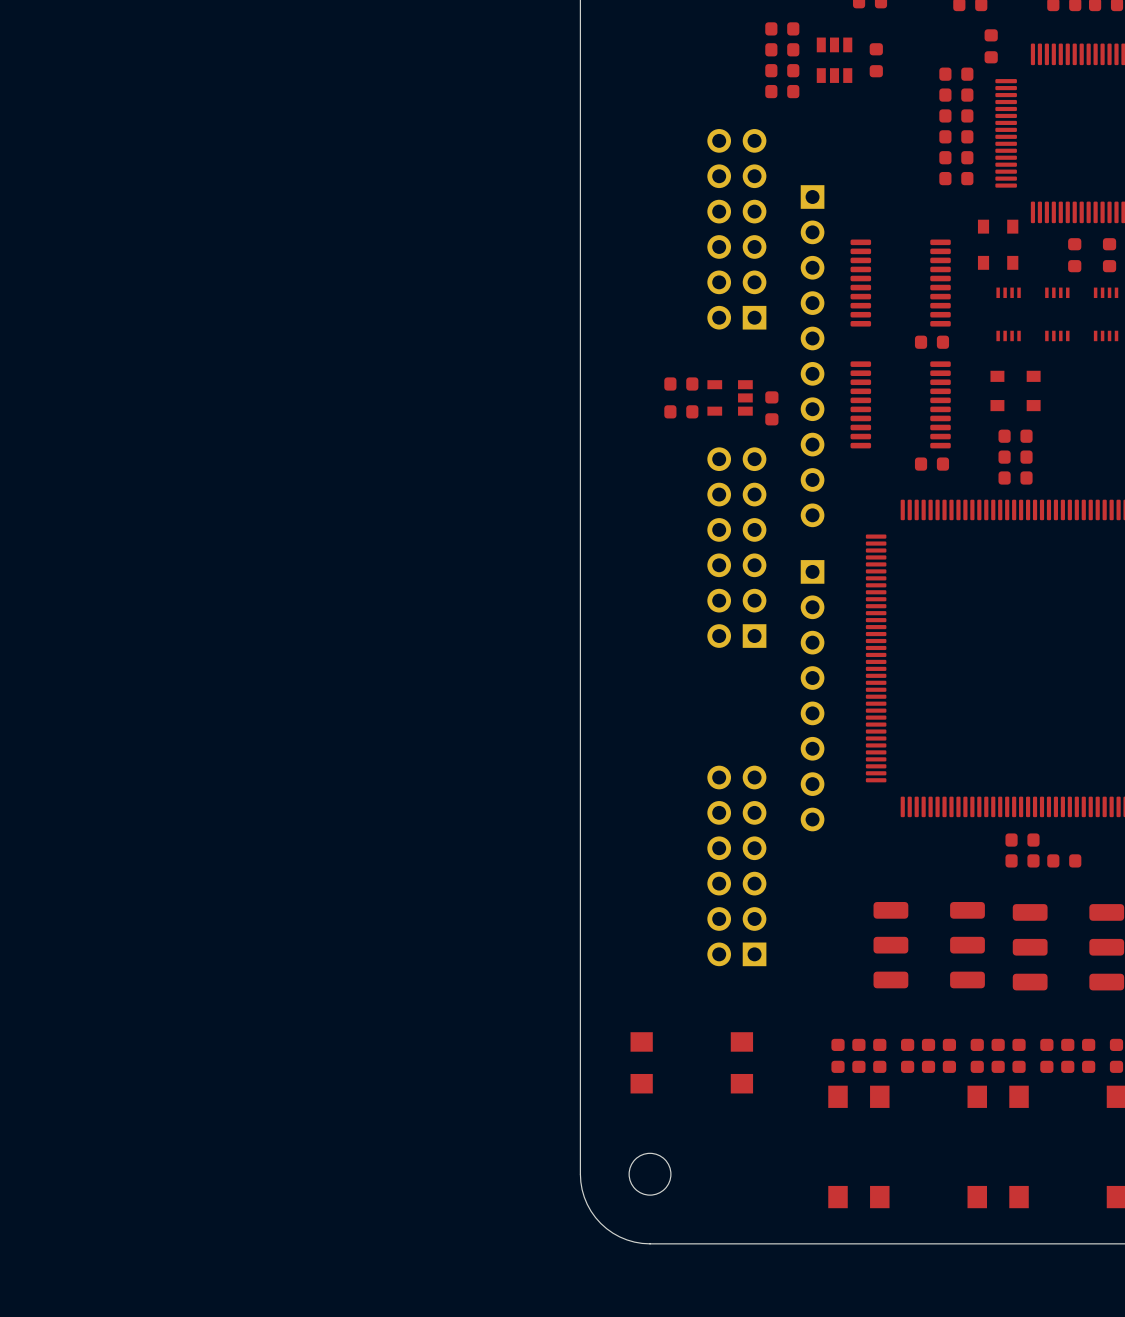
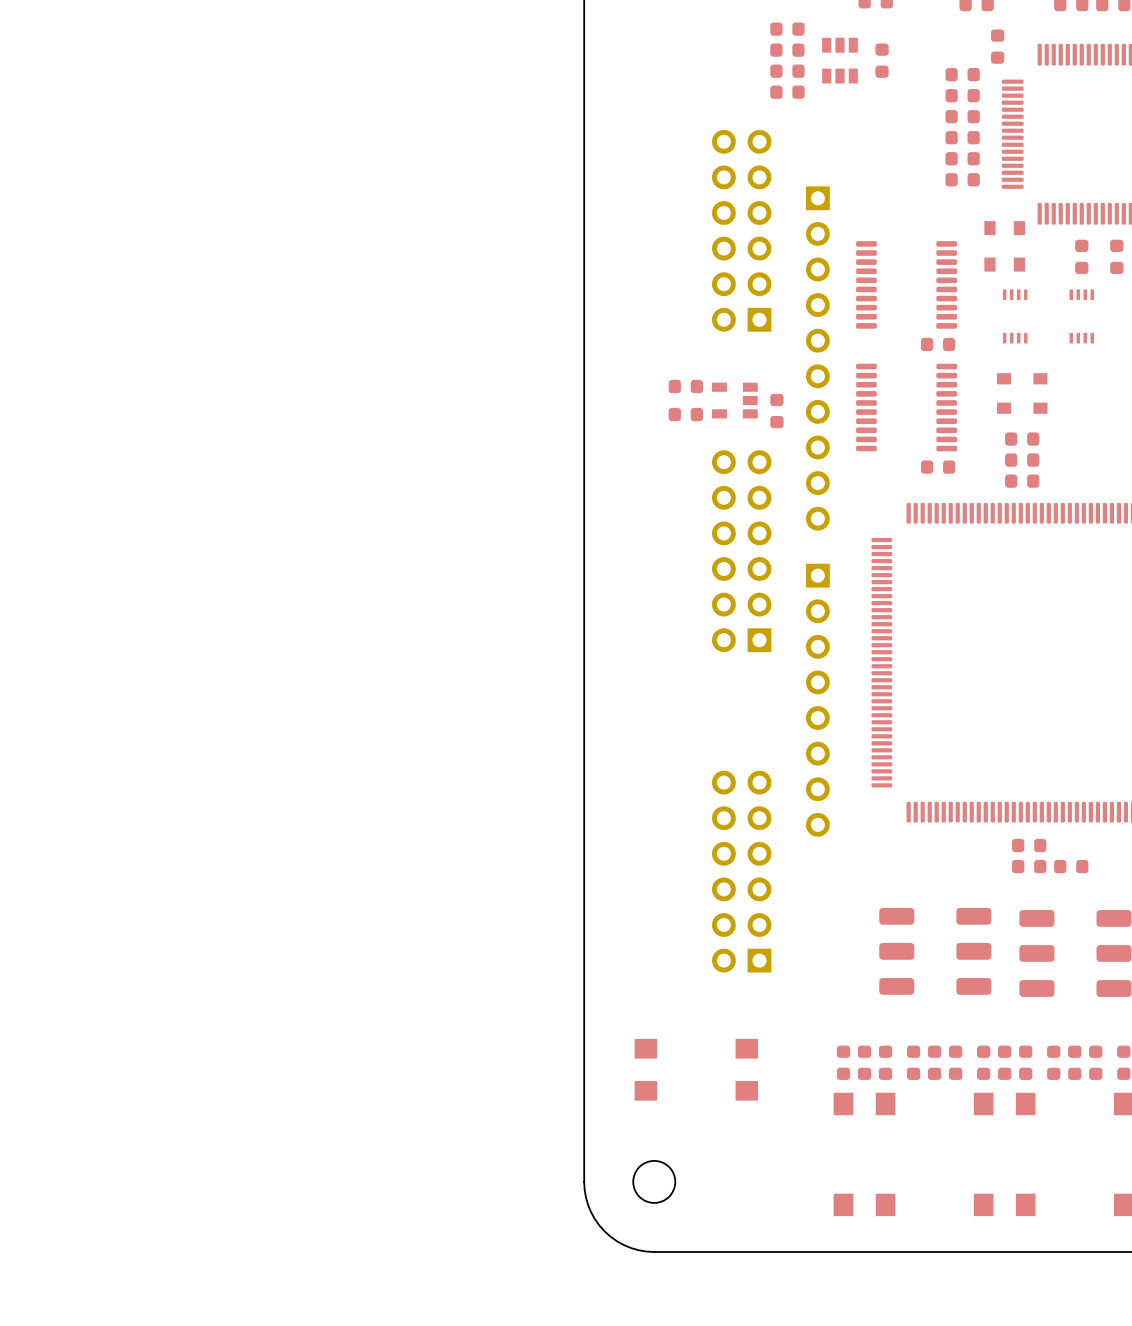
part: (1057, 314) -> none
part: none -> (1081, 316)
part: (1106, 314) -> none

